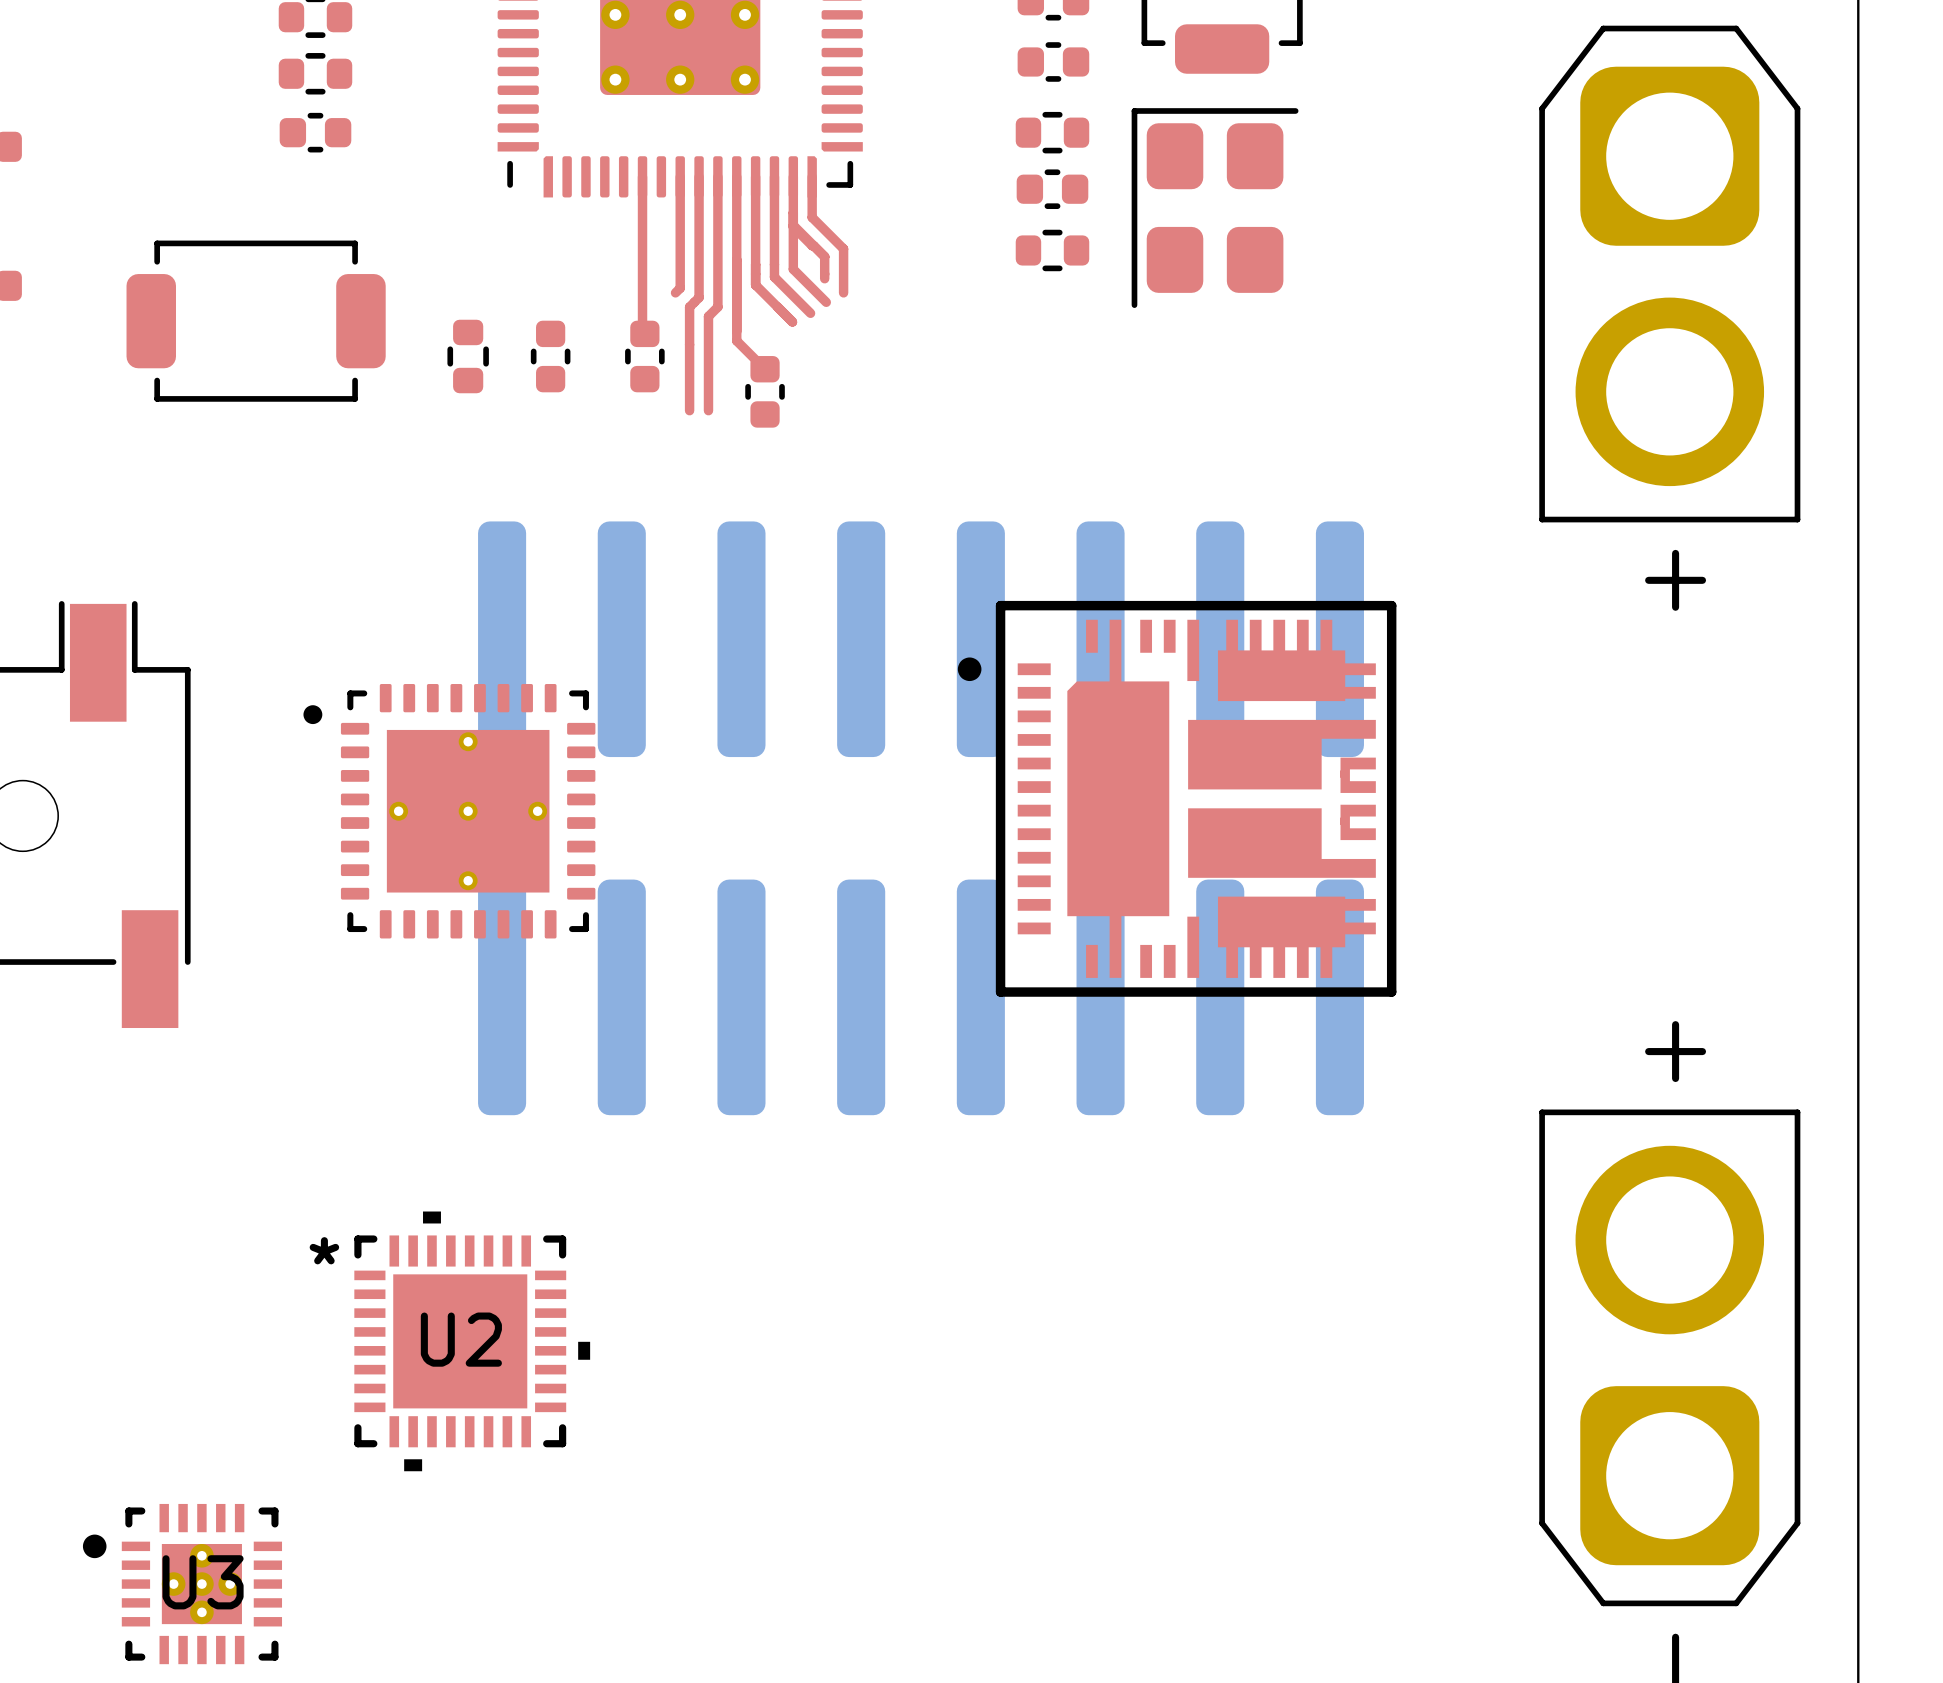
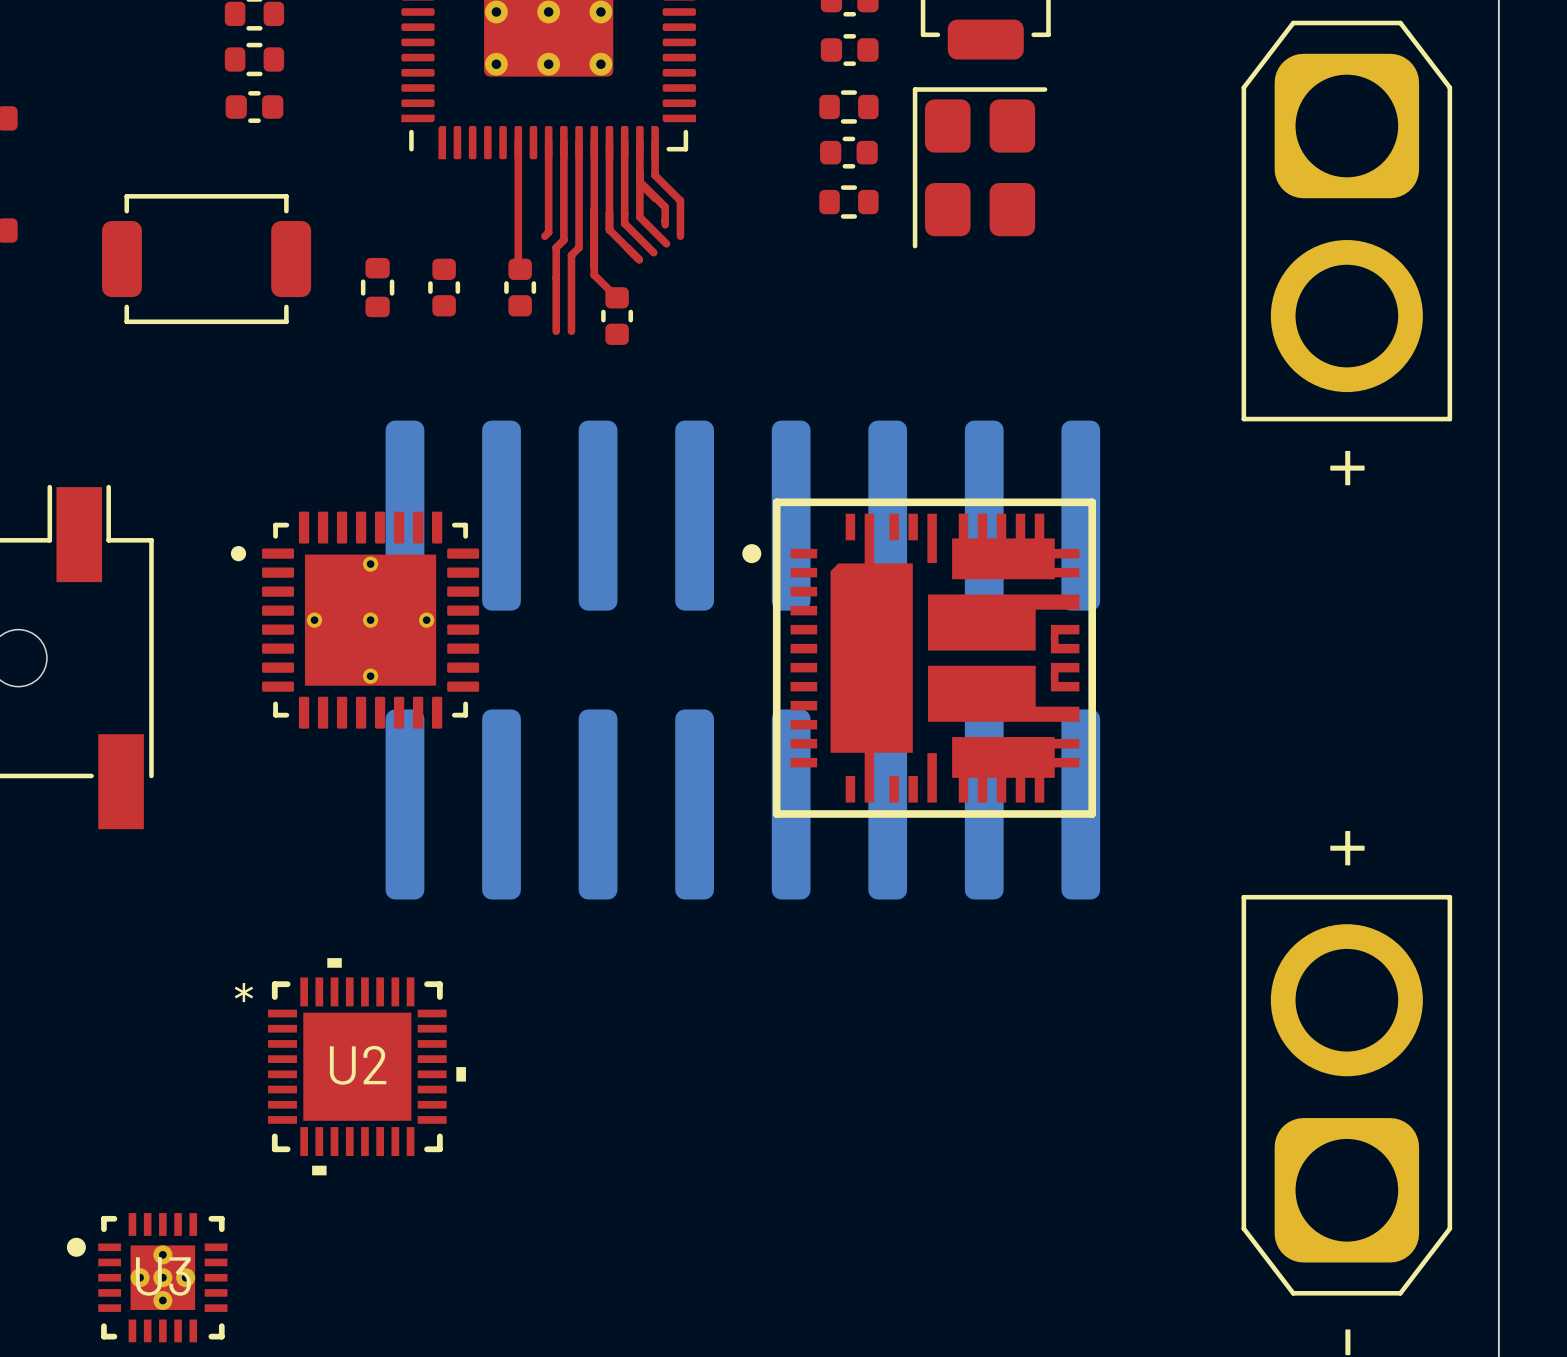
part footprint: [303, 684, 596, 939] -> [230, 511, 480, 729]
part position: (1177, 798) -> (919, 658)
U2 footprint: [354, 1211, 591, 1472] -> [268, 958, 466, 1176]

